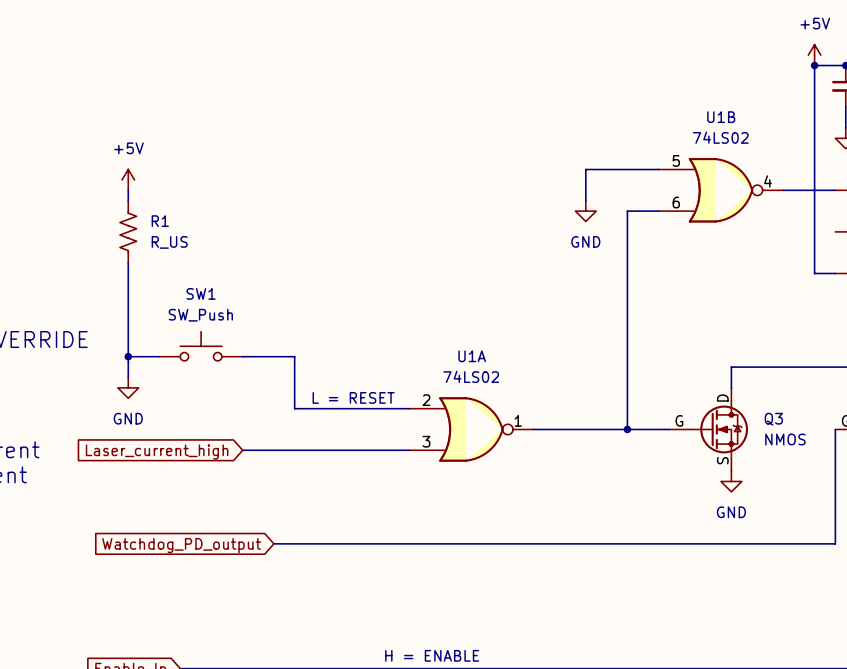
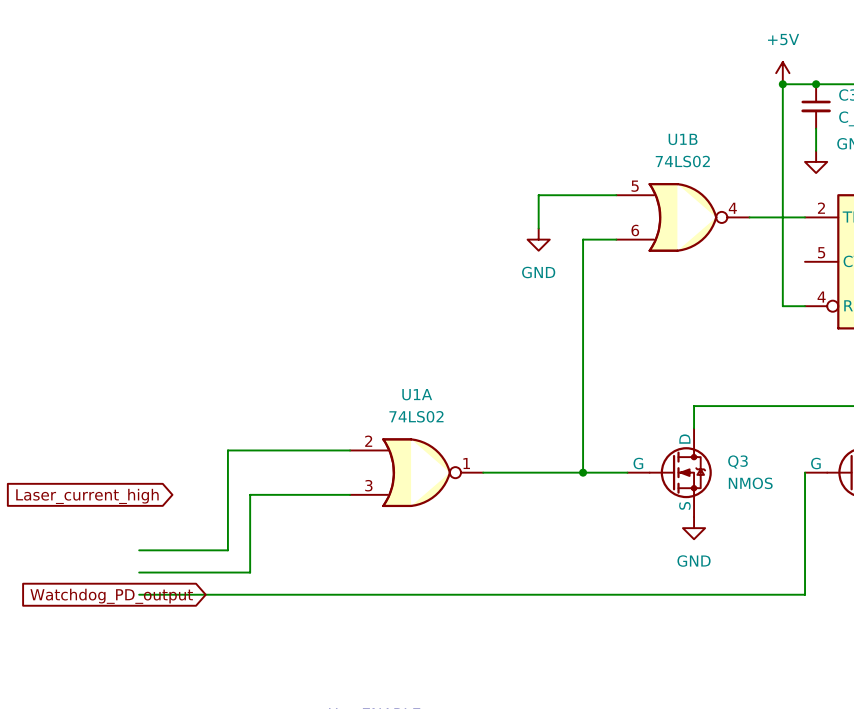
power symbol: +5V (128, 179) -> none
wire: (128, 190) (128, 200) -> none
R1: R_US (128, 231) -> none
wire: (128, 263) (128, 377) -> none
SW1: SW_Push (201, 346) -> none
wire: (128, 356) (159, 356) -> none
junction: (128, 356) -> none
wire: (242, 356) (294, 356) (294, 408) -> (139, 550) (227, 550) (227, 450)
power symbol: GND (128, 387) -> none
text: L = RESET (353, 397) -> none
wire: (242, 450) (315, 450) -> (139, 572) (250, 572) (250, 494)
wire: none -> (139, 594) (205, 594)

